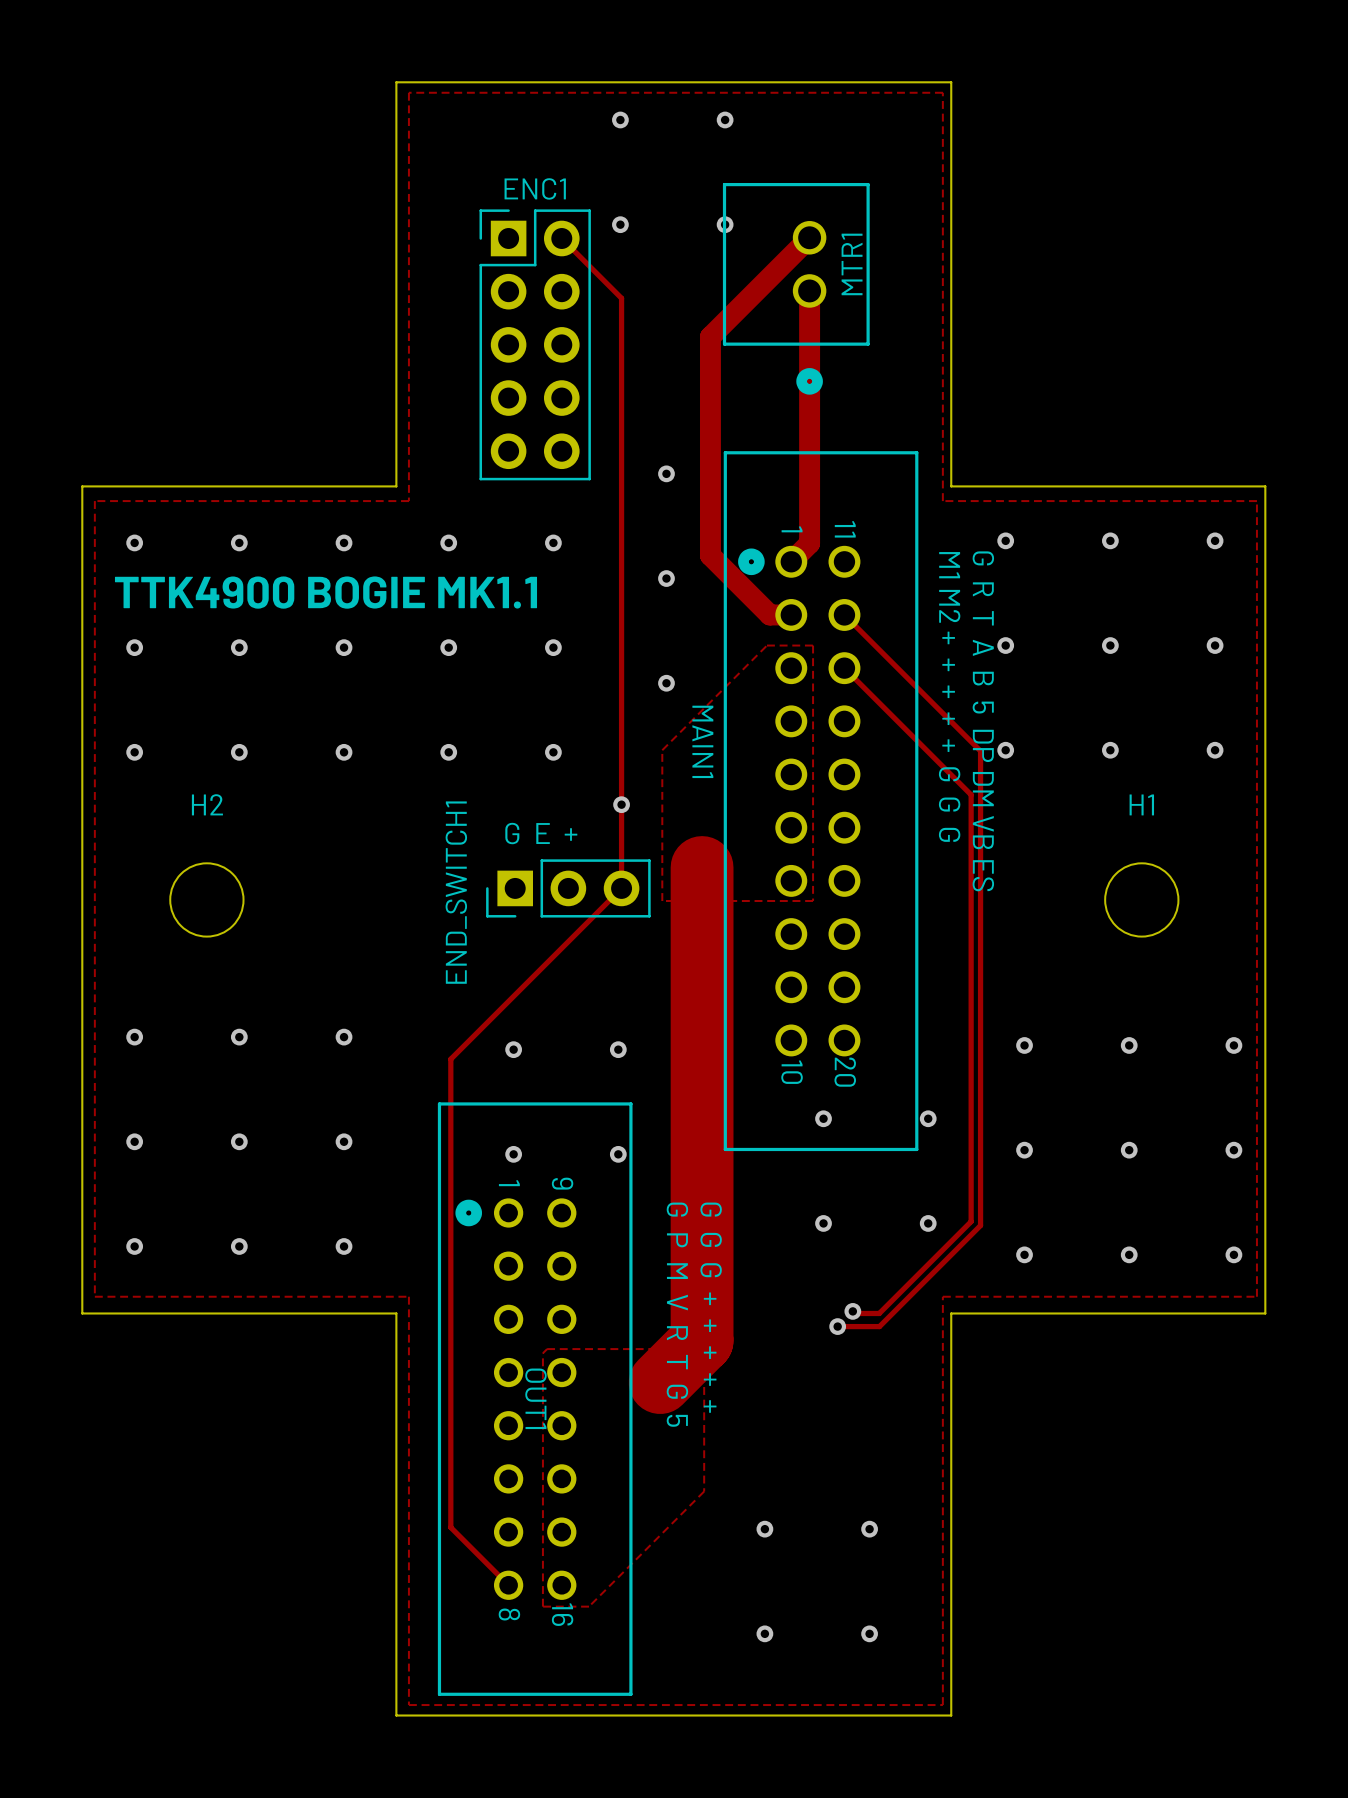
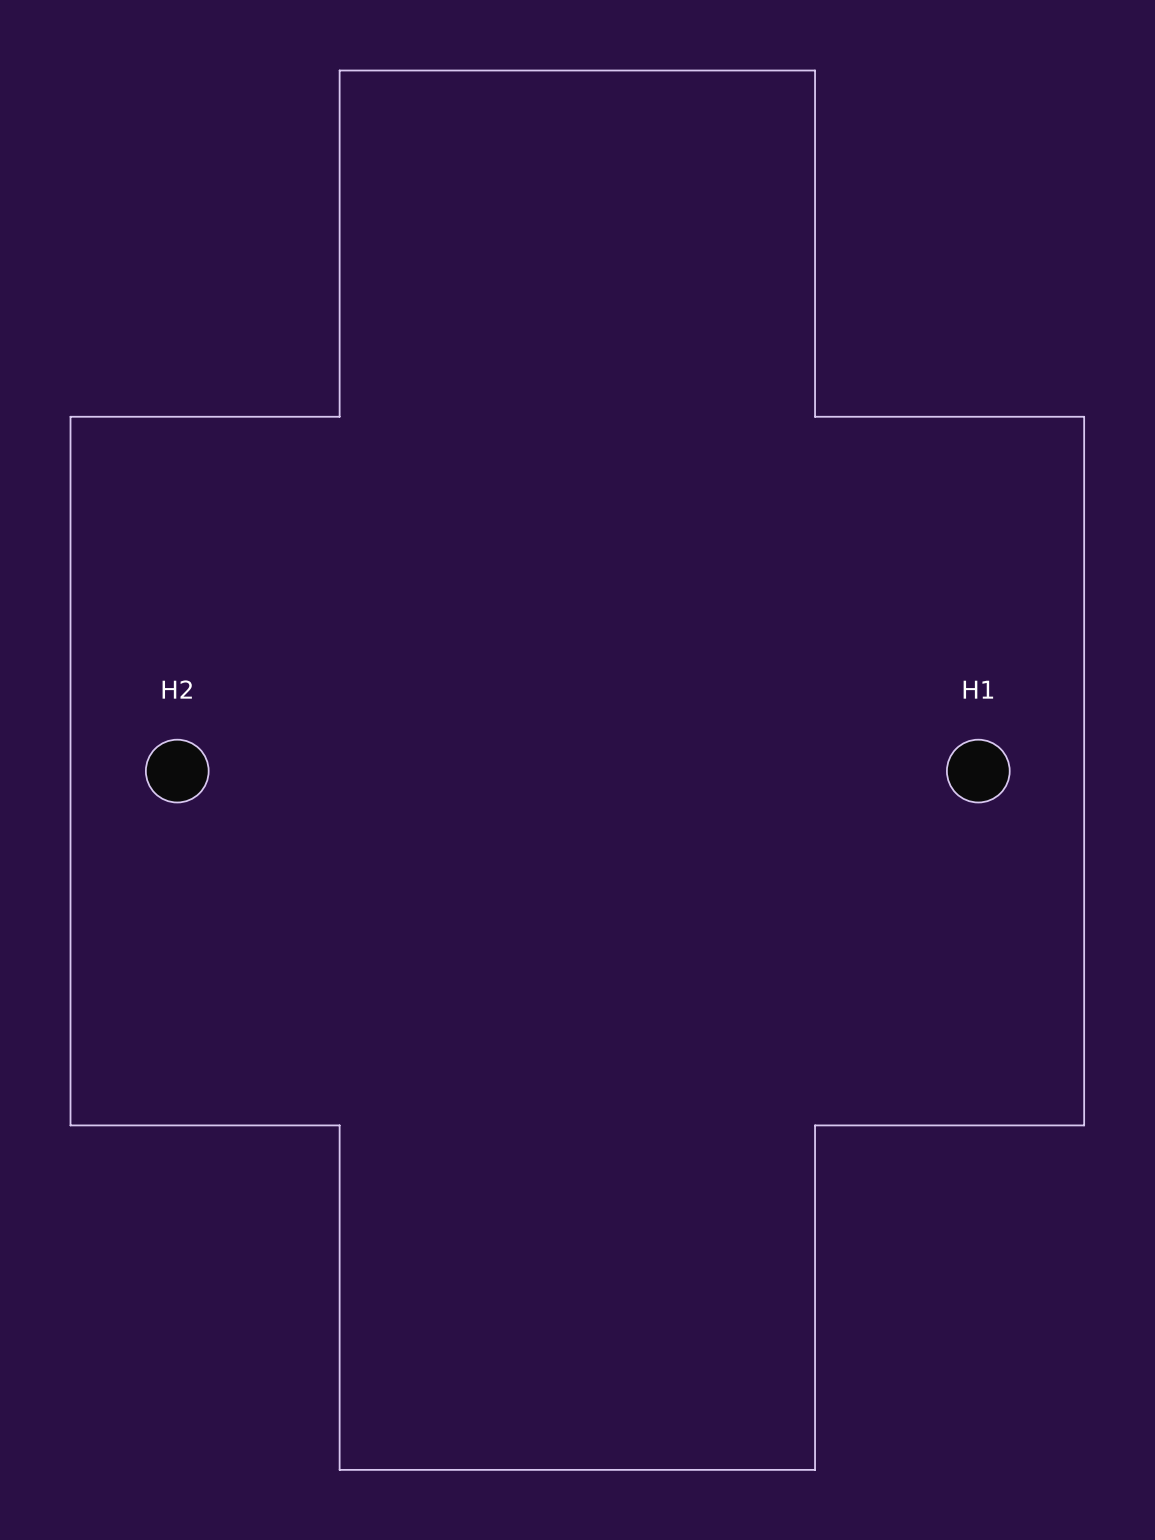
zone outline: (408, 92) (408, 501) (94, 501) (94, 1296) (408, 1296) (408, 1705) (942, 1705) (942, 1296) (1256, 1296) (1256, 501) (942, 501) (942, 92) (408, 92) -> none
via: (620, 119) -> none
via: (725, 119) -> none
via: (620, 224) -> none
via: (725, 224) -> none
track: (809, 237) (710, 336) (710, 555) (769, 614) (791, 614) -> none
track: (561, 238) (621, 298) (621, 888) (450, 1059) (450, 1527) (508, 1585) -> none
MTR1: (796, 288) -> none
track: (809, 290) (809, 543) (791, 561) -> none
ENC1: (535, 344) -> none
via: (666, 473) -> none
via: (1005, 540) -> none
via: (1110, 540) -> none
via: (1215, 540) -> none
via: (134, 542) -> none
via: (239, 542) -> none
via: (344, 542) -> none
via: (448, 542) -> none
via: (553, 542) -> none
via: (666, 578) -> none
text: TTK4900 BOGIE MK1.1 (326, 592) -> none
track: (844, 614) (980, 751) (980, 1225) (879, 1326) (837, 1326) -> none
zone outline: (766, 645) (662, 750) (662, 900) (813, 900) (813, 645) (766, 645) -> none
via: (1005, 645) -> none
via: (1110, 645) -> none
via: (1215, 645) -> none
via: (134, 647) -> none
via: (239, 647) -> none
via: (344, 647) -> none
via: (448, 647) -> none
via: (553, 647) -> none
track: (844, 668) (971, 794) (971, 1221) (879, 1313) (854, 1313) (852, 1311) -> none
via: (666, 683) -> none
text: M1 M2 + + + + + G G G (949, 696) -> none
text: G R T A B 5 DP DM VB ES (983, 721) -> none
via: (1005, 750) -> none
via: (1110, 750) -> none
via: (1215, 750) -> none
via: (134, 752) -> none
via: (239, 752) -> none
via: (344, 752) -> none
via: (448, 752) -> none
via: (553, 752) -> none
MAIN1: (821, 801) -> none
via: (621, 804) -> none
text: G E + (541, 833) -> none
track: (702, 867) (702, 1340) (660, 1382) -> none
END_SWITCH1: (568, 888) -> none
via: (134, 1037) -> none
via: (239, 1037) -> none
via: (344, 1037) -> none
via: (1024, 1045) -> none
via: (1129, 1045) -> none
via: (1233, 1045) -> none
via: (513, 1049) -> none
via: (618, 1049) -> none
via: (823, 1118) -> none
via: (928, 1118) -> none
via: (134, 1141) -> none
via: (239, 1141) -> none
via: (344, 1141) -> none
via: (1024, 1150) -> none
via: (1129, 1150) -> none
via: (1233, 1150) -> none
via: (513, 1154) -> none
via: (618, 1154) -> none
via: (823, 1223) -> none
via: (928, 1223) -> none
via: (134, 1246) -> none
via: (239, 1246) -> none
via: (344, 1246) -> none
via: (1024, 1254) -> none
via: (1129, 1254) -> none
via: (1233, 1254) -> none
text: G G G + + + + + (711, 1307) -> none
via: (852, 1311) -> none
text: G P M V R T G 5 (677, 1314) -> none
via: (837, 1326) -> none
zone outline: (547, 1349) (542, 1353) (542, 1606) (589, 1606) (704, 1491) (704, 1349) (547, 1349) -> none
OUT1: (535, 1399) -> none
via: (764, 1529) -> none
via: (869, 1529) -> none
via: (764, 1633) -> none
via: (869, 1633) -> none

